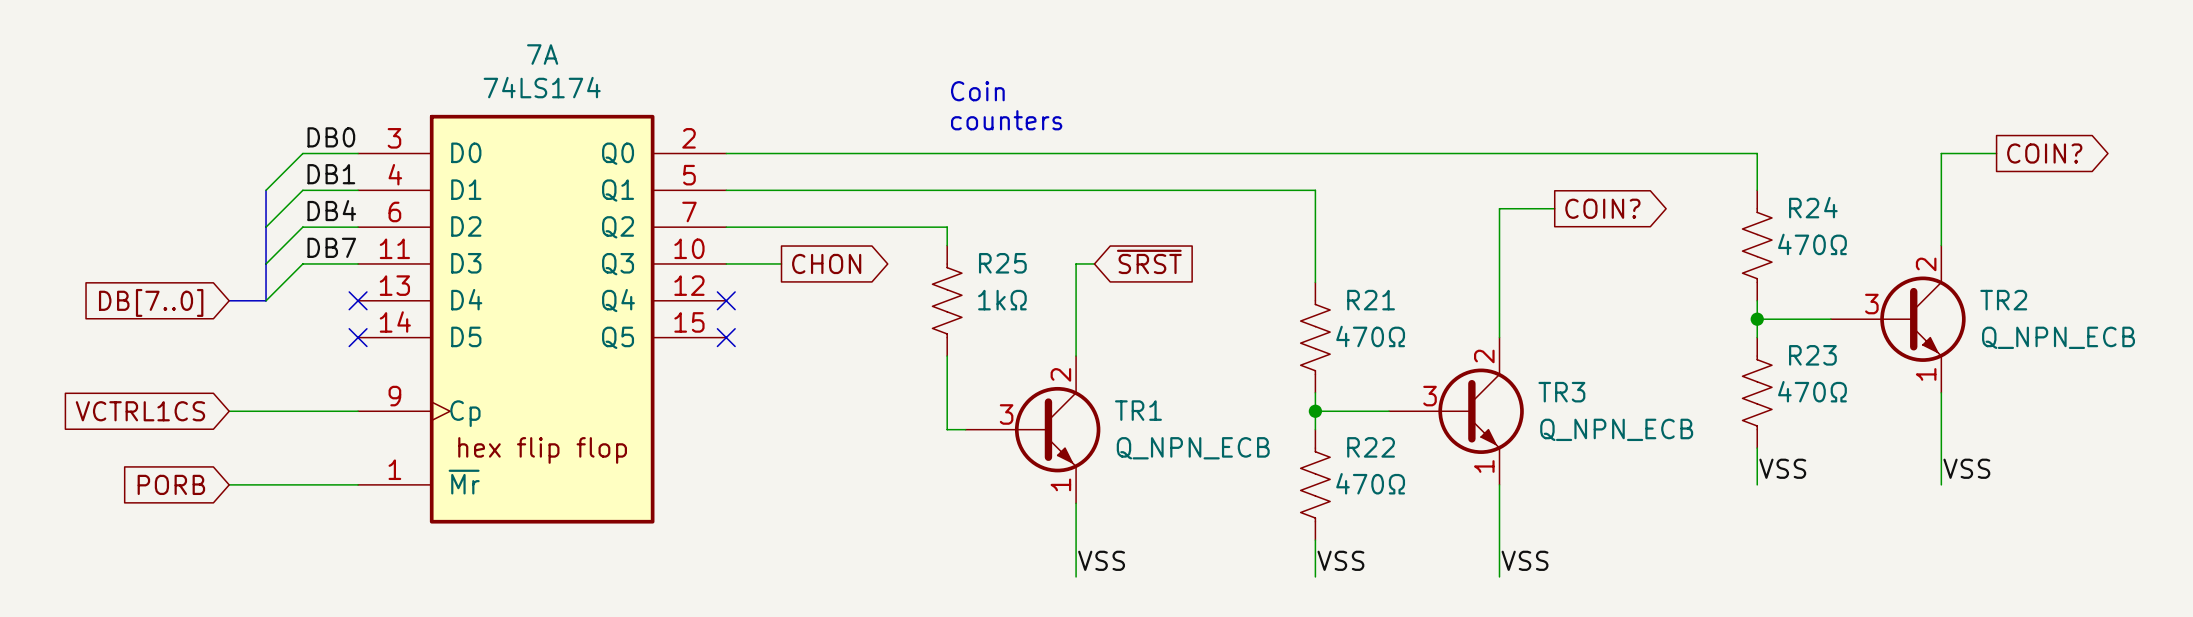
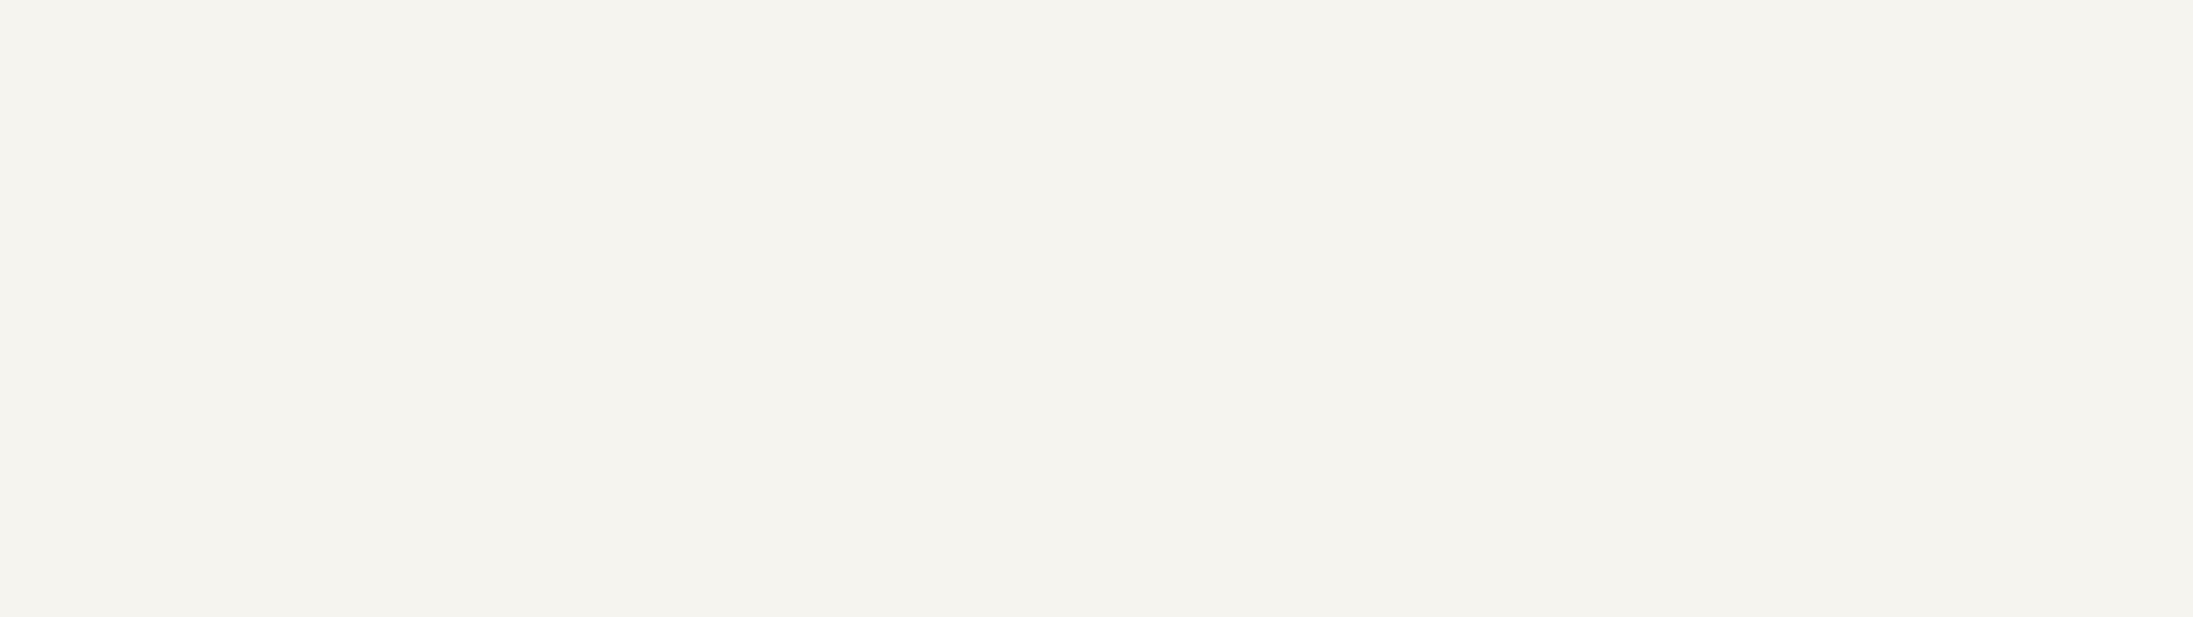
text: Coin (977, 91) -> none
text: counters (1006, 120) -> none
label: DB0 (331, 137) -> none
wire: (358, 153) (302, 153) (266, 190) -> none
wire: (726, 153) (1757, 153) (1757, 190) -> none
wire: (1996, 153) (1941, 153) (1941, 245) -> none
global label: COIN? (2044, 153) -> none
label: DB1 (331, 174) -> none
bus: (266, 190) (266, 300) (229, 300) -> none
wire: (358, 190) (302, 190) (266, 227) -> none
wire: (726, 190) (1315, 190) (1315, 282) -> none
wire: (1554, 208) (1499, 208) (1499, 337) -> none
global label: COIN? (1602, 208) -> none
label: DB4 (331, 210) -> none
wire: (358, 227) (302, 227) (266, 263) -> none
wire: (726, 227) (947, 227) (947, 245) -> none
R24: 470Ω (1757, 245) -> none
label: DB7 (331, 247) -> none
global label: ~{SRST} (1149, 261) -> none
wire: (358, 263) (302, 263) (266, 300) -> none
wire: (726, 263) (781, 263) -> none
global label: CHON (826, 263) -> none
wire: (1094, 263) (1076, 263) (1076, 356) -> none
no-connect mark: (358, 300) -> none
no-connect mark: (726, 300) -> none
R25: 1kΩ (947, 300) -> none
wire: (1757, 300) (1757, 337) -> none
global label: DB[7..0] (151, 302) -> none
7A: 74LS174 (542, 319) -> none
wire: (1757, 319) (1830, 319) -> none
junction: (1757, 319) -> none
TR2: Q_NPN_ECB (1898, 319) -> none
no-connect mark: (358, 337) -> none
no-connect mark: (726, 337) -> none
R21: 470Ω (1315, 337) -> none
wire: (947, 356) (947, 429) (965, 429) -> none
wire: (1315, 392) (1315, 429) -> none
R23: 470Ω (1757, 392) -> none
wire: (1941, 392) (1941, 484) -> none
global label: VCTRL1CS (140, 411) -> none
wire: (229, 411) (358, 411) -> none
wire: (1315, 411) (1389, 411) -> none
junction: (1315, 411) -> none
TR3: Q_NPN_ECB (1456, 411) -> none
TR1: Q_NPN_ECB (1032, 429) -> none
wire: (1757, 448) (1757, 484) -> none
label: VSS (1782, 468) -> none
label: VSS (1966, 468) -> none
global label: PORB (171, 484) -> none
wire: (229, 484) (358, 484) -> none
R22: 470Ω (1315, 484) -> none
wire: (1499, 484) (1499, 576) -> none
wire: (1076, 503) (1076, 576) -> none
wire: (1315, 540) (1315, 576) -> none
label: VSS (1101, 560) -> none
label: VSS (1340, 560) -> none
label: VSS (1525, 560) -> none

